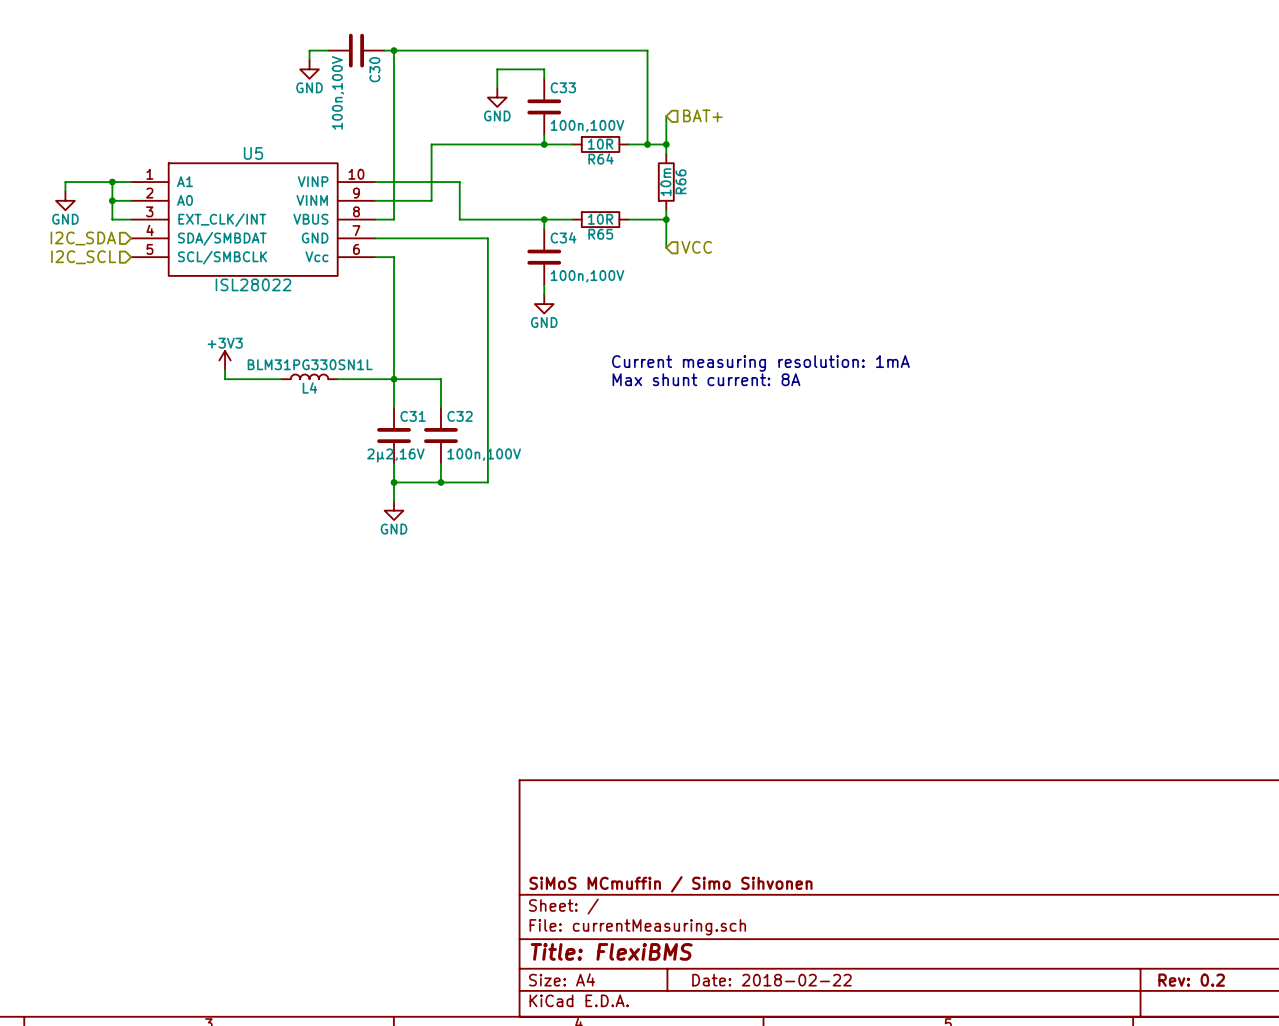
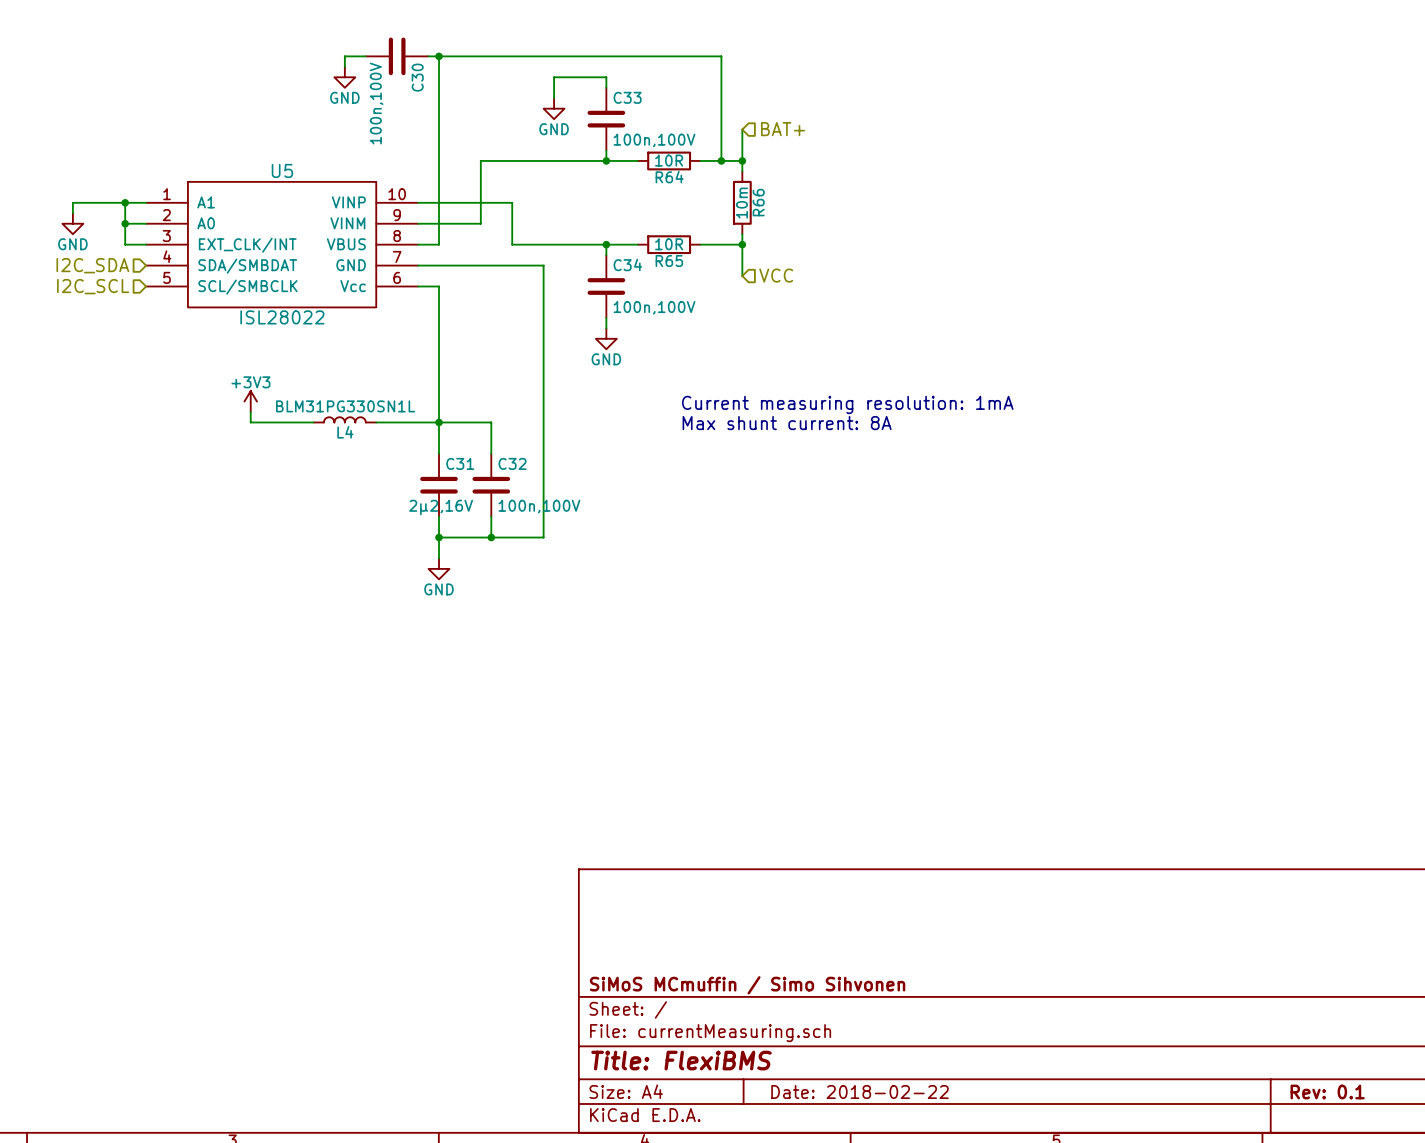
title block: Rev: 0.2 (1191, 980) -> Rev: 0.1 (1327, 1092)

